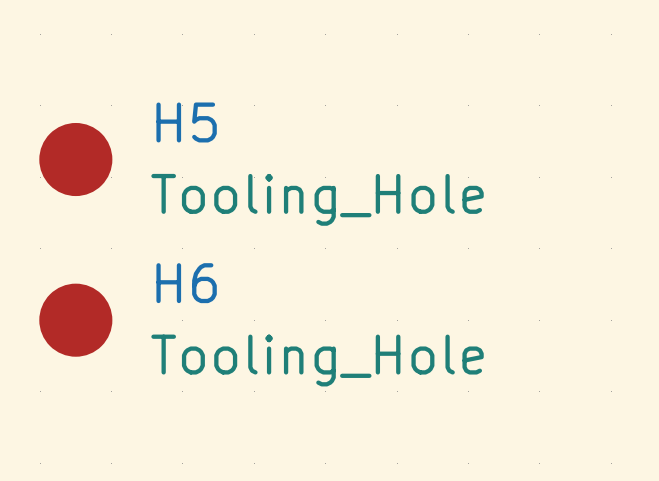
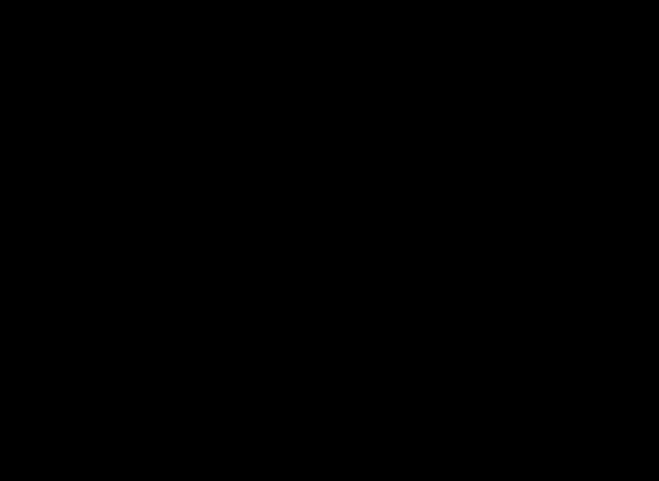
H5: Tooling_Hole (75, 159) -> none
H6: Tooling_Hole (75, 320) -> none

